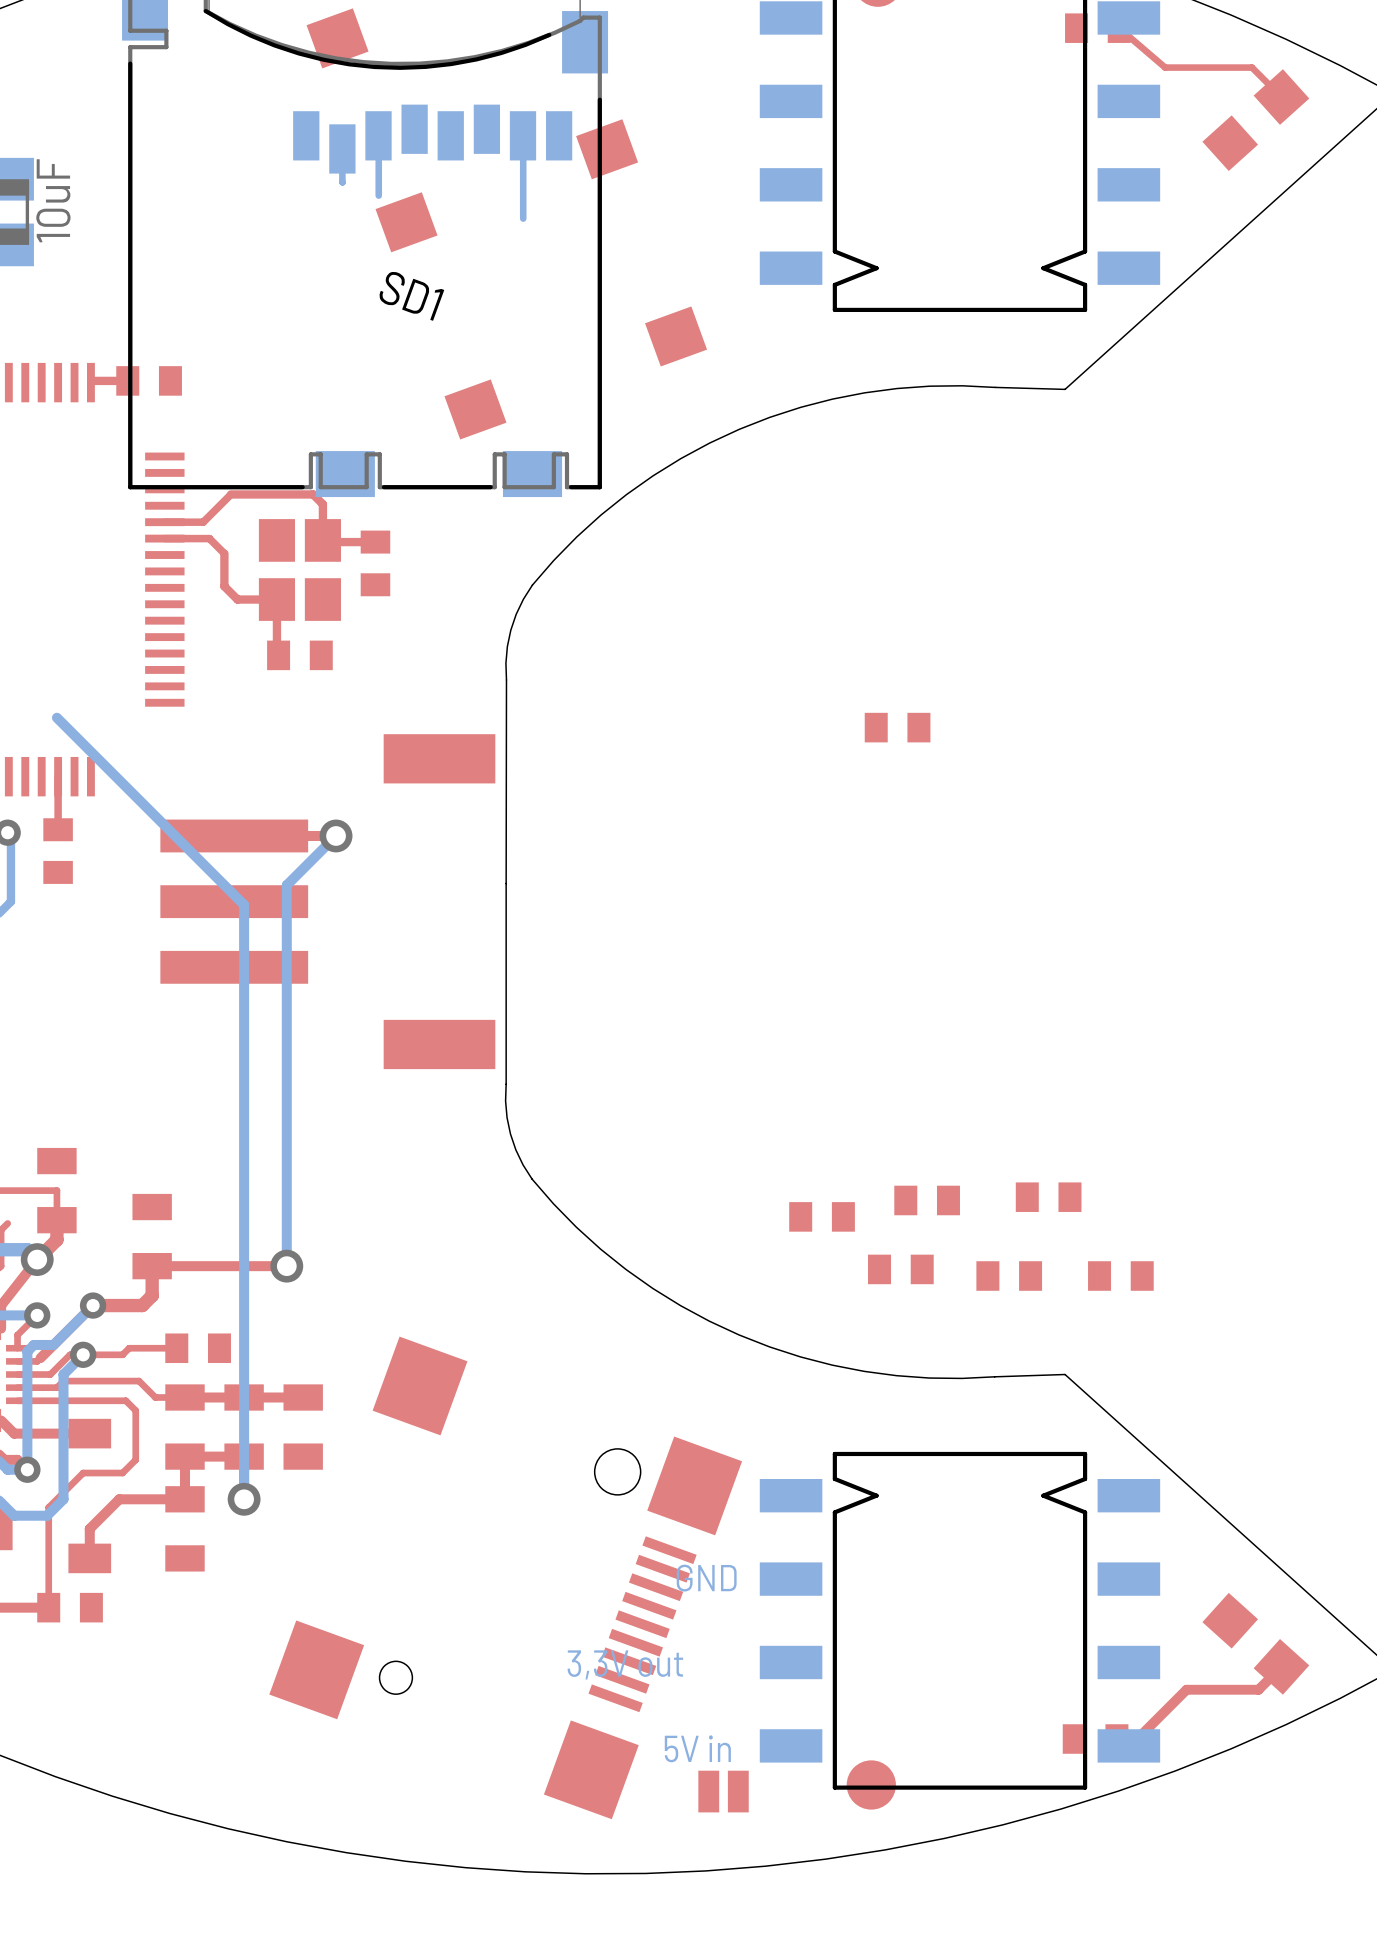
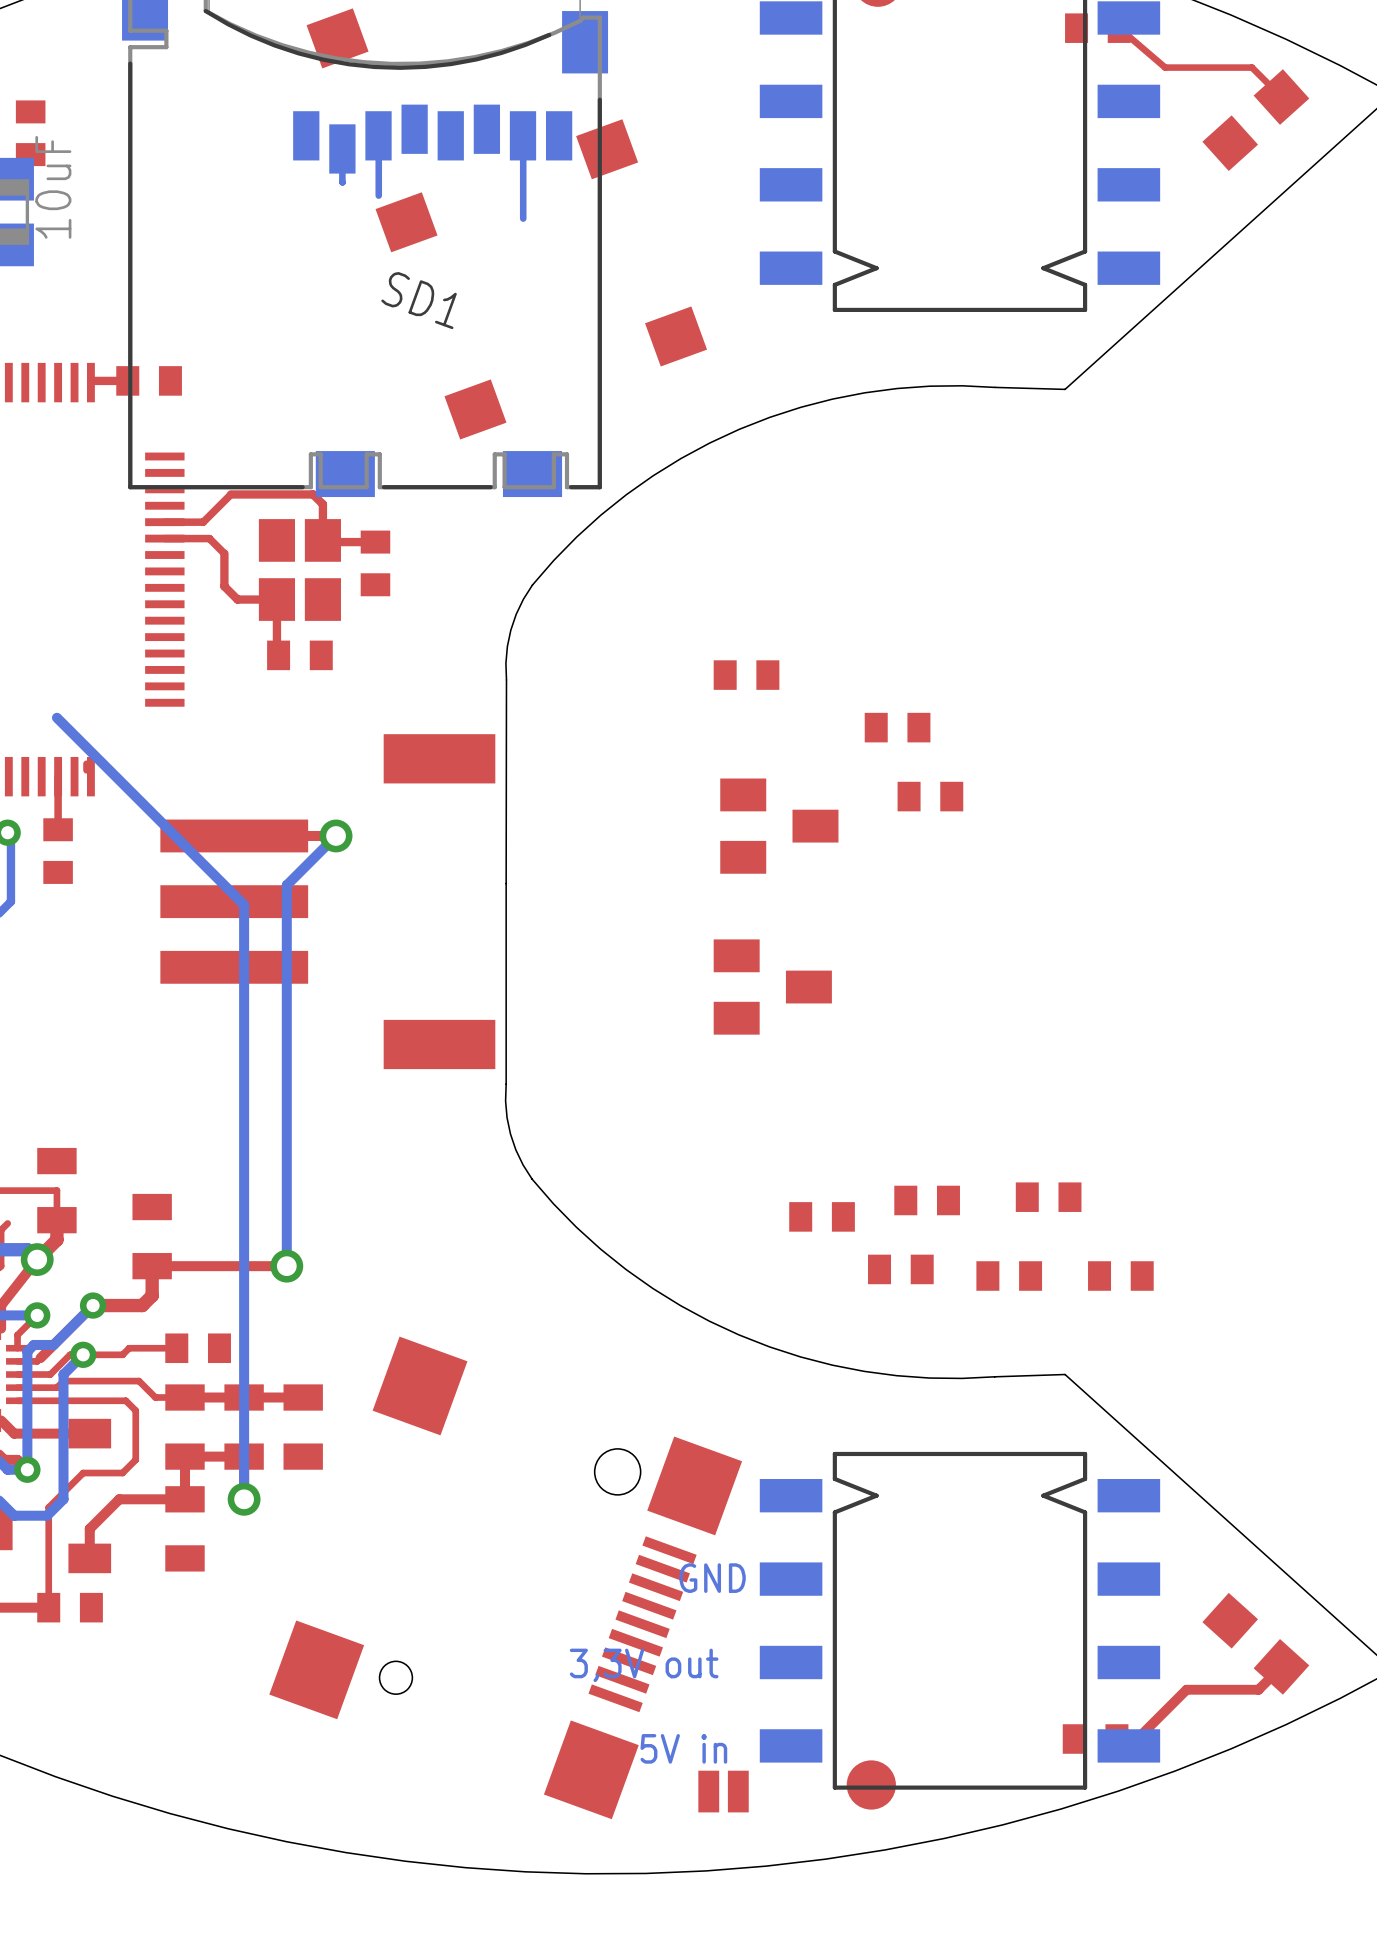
part: none -> (30, 133)
part: none -> (746, 675)
top track: none -> (86, 763) (86, 770)
part: none -> (930, 796)
part: none -> (779, 826)
part: none -> (772, 987)

